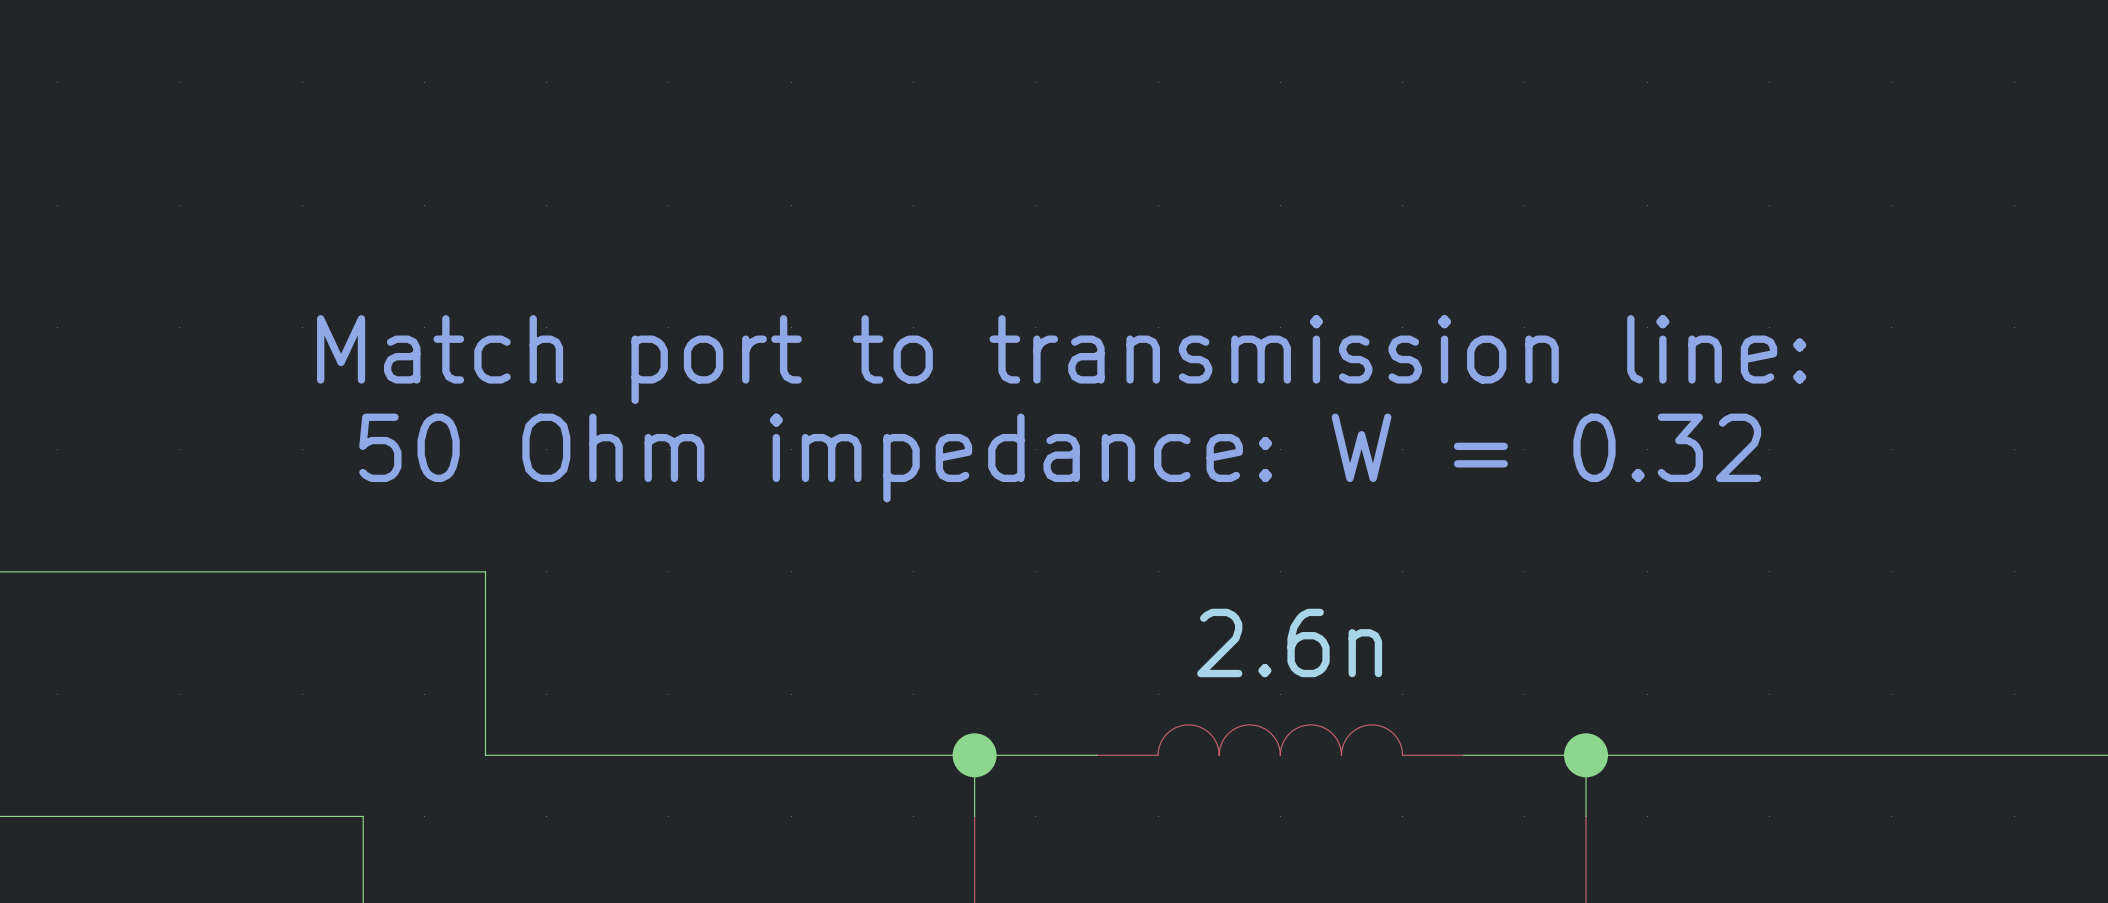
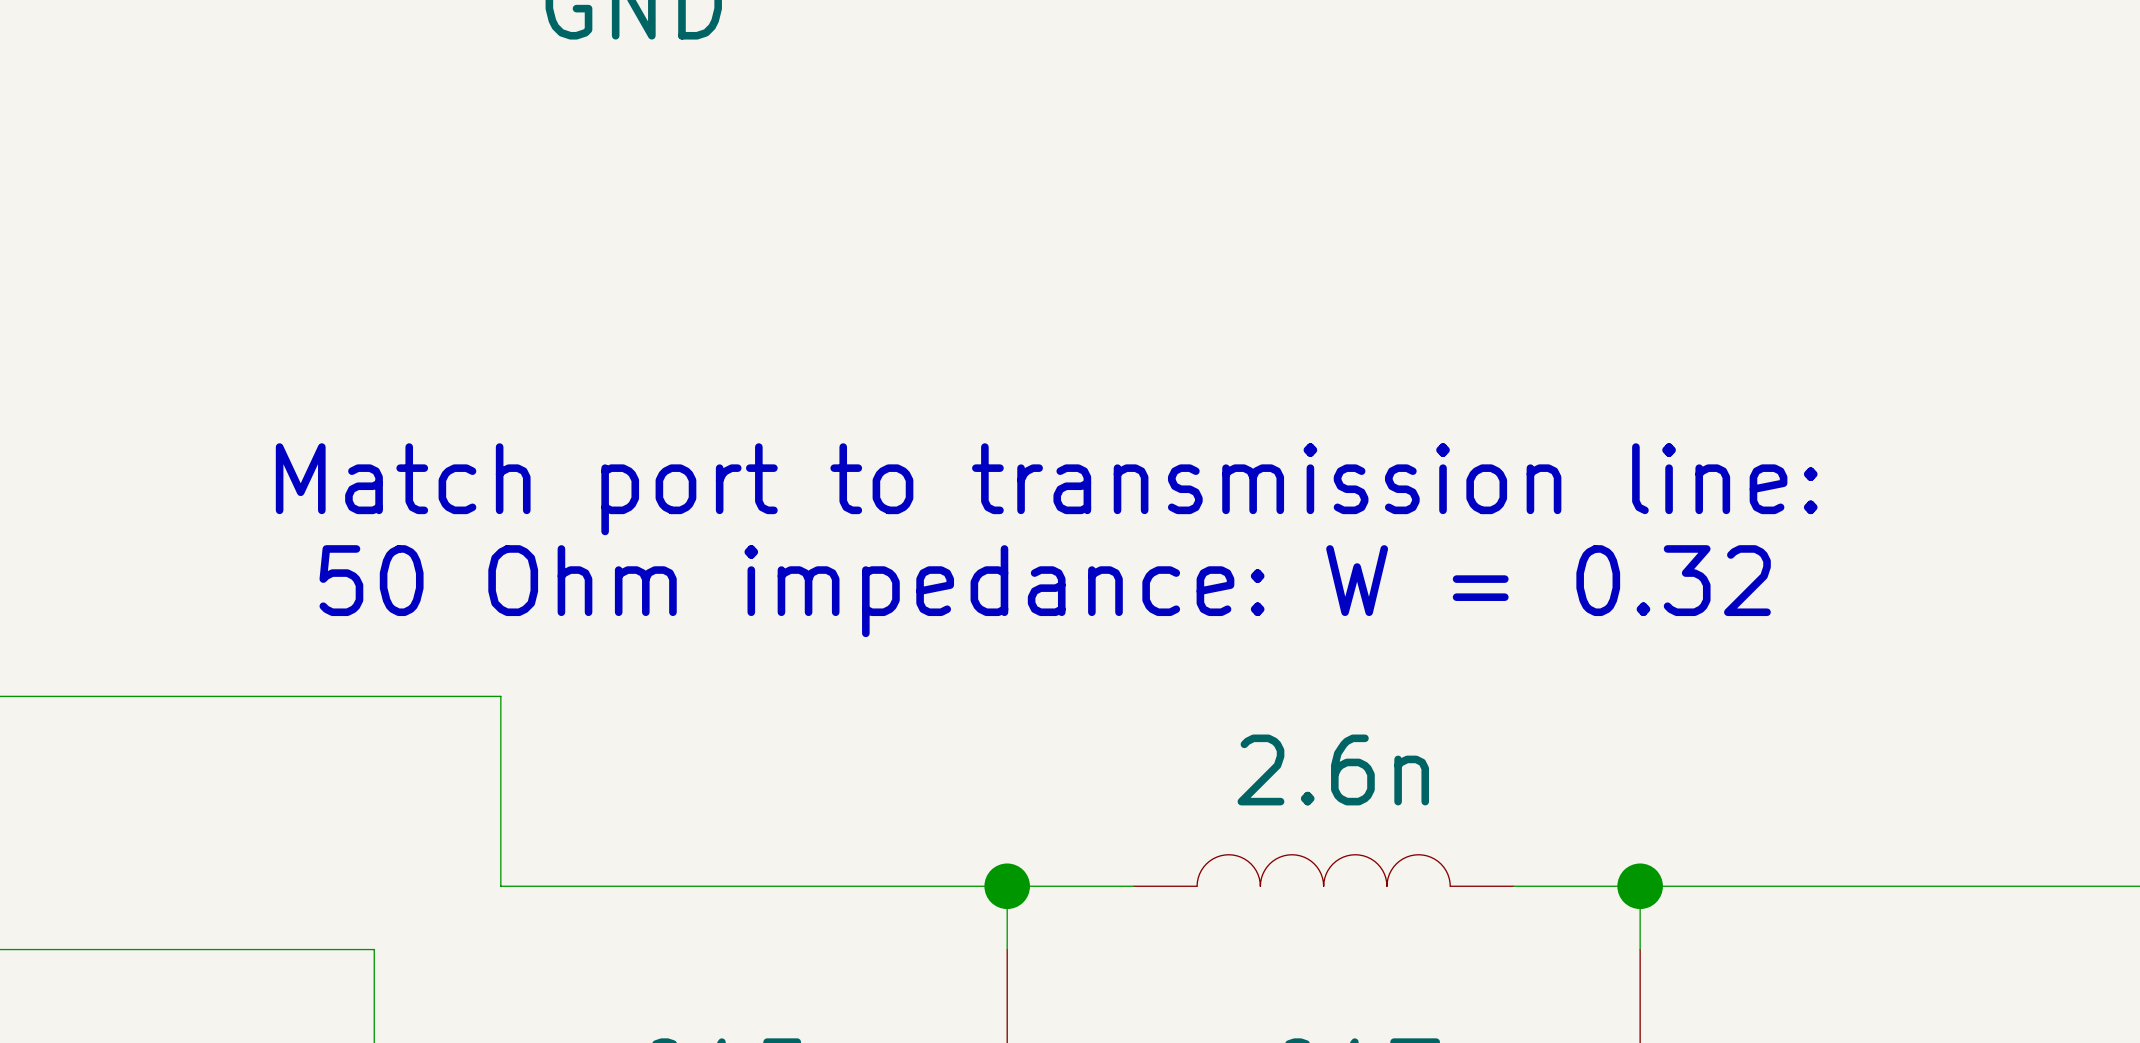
text position: Match port to transmission line: (1061, 359) -> Match port to transmission line: (1046, 489)
text position: 50 Ohm impedance: W = 0.32 (1060, 458) -> 50 Ohm impedance: W = 0.32 (1045, 591)

